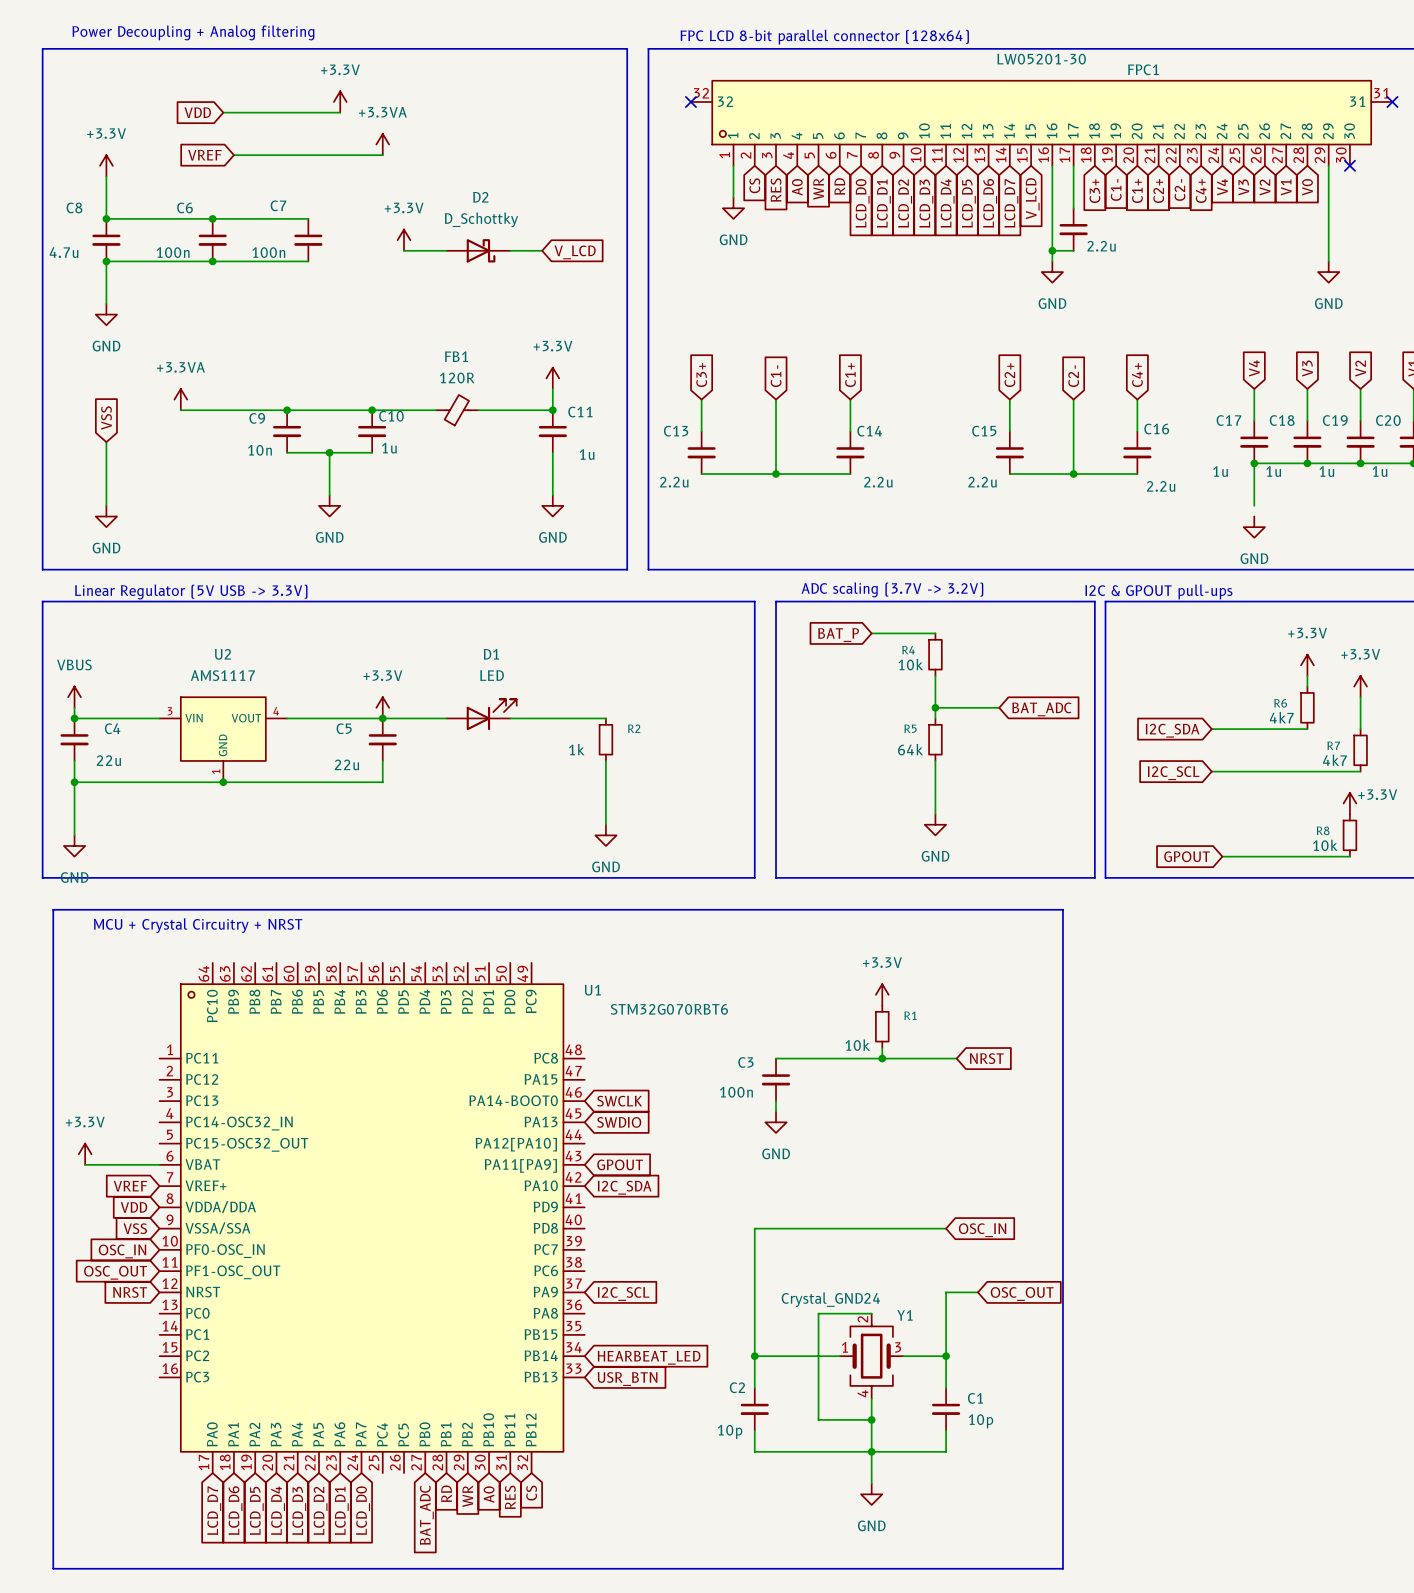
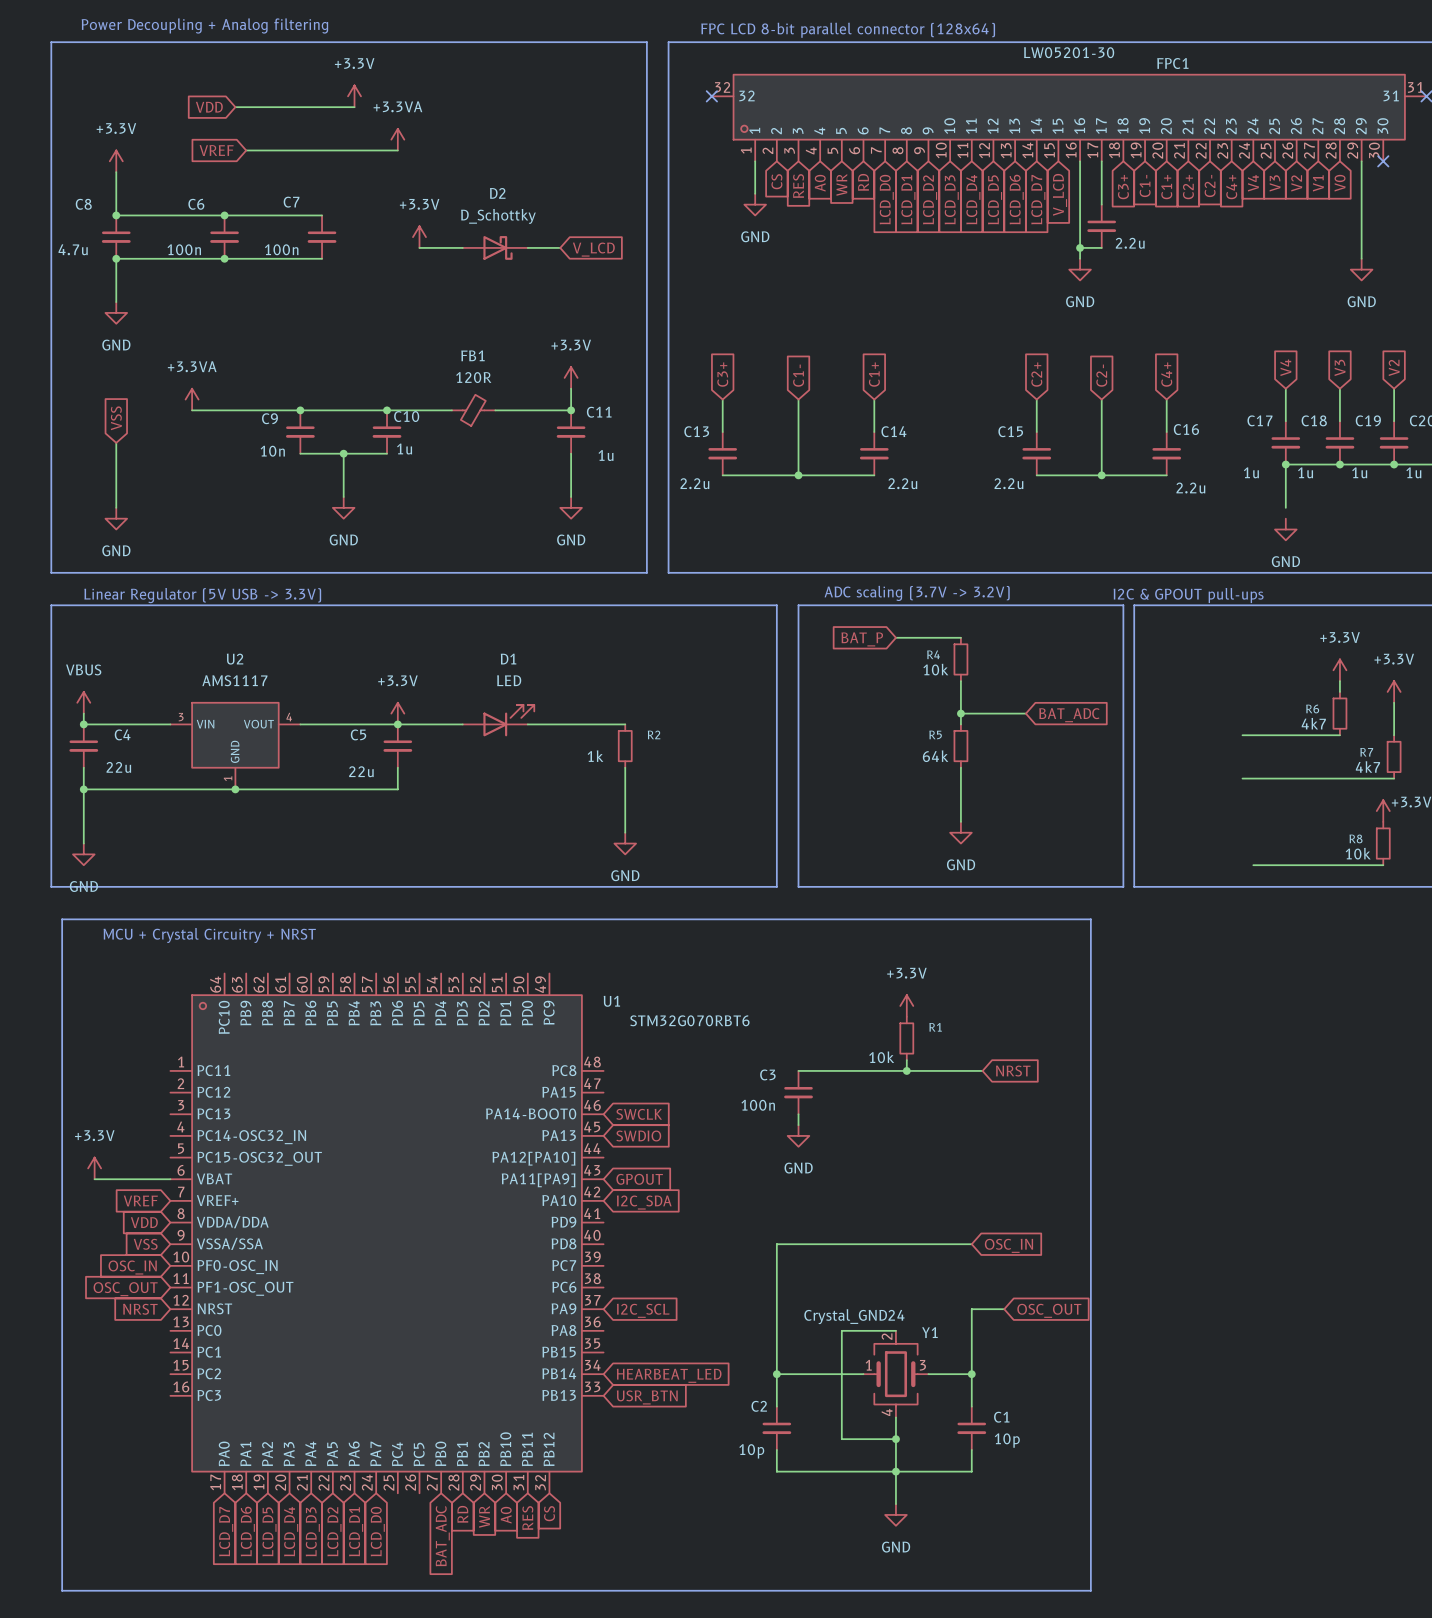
global label: I2C_SDA (1172, 730) -> none
global label: I2C_SCL (1173, 773) -> none
global label: GPOUT (1187, 856) -> none

